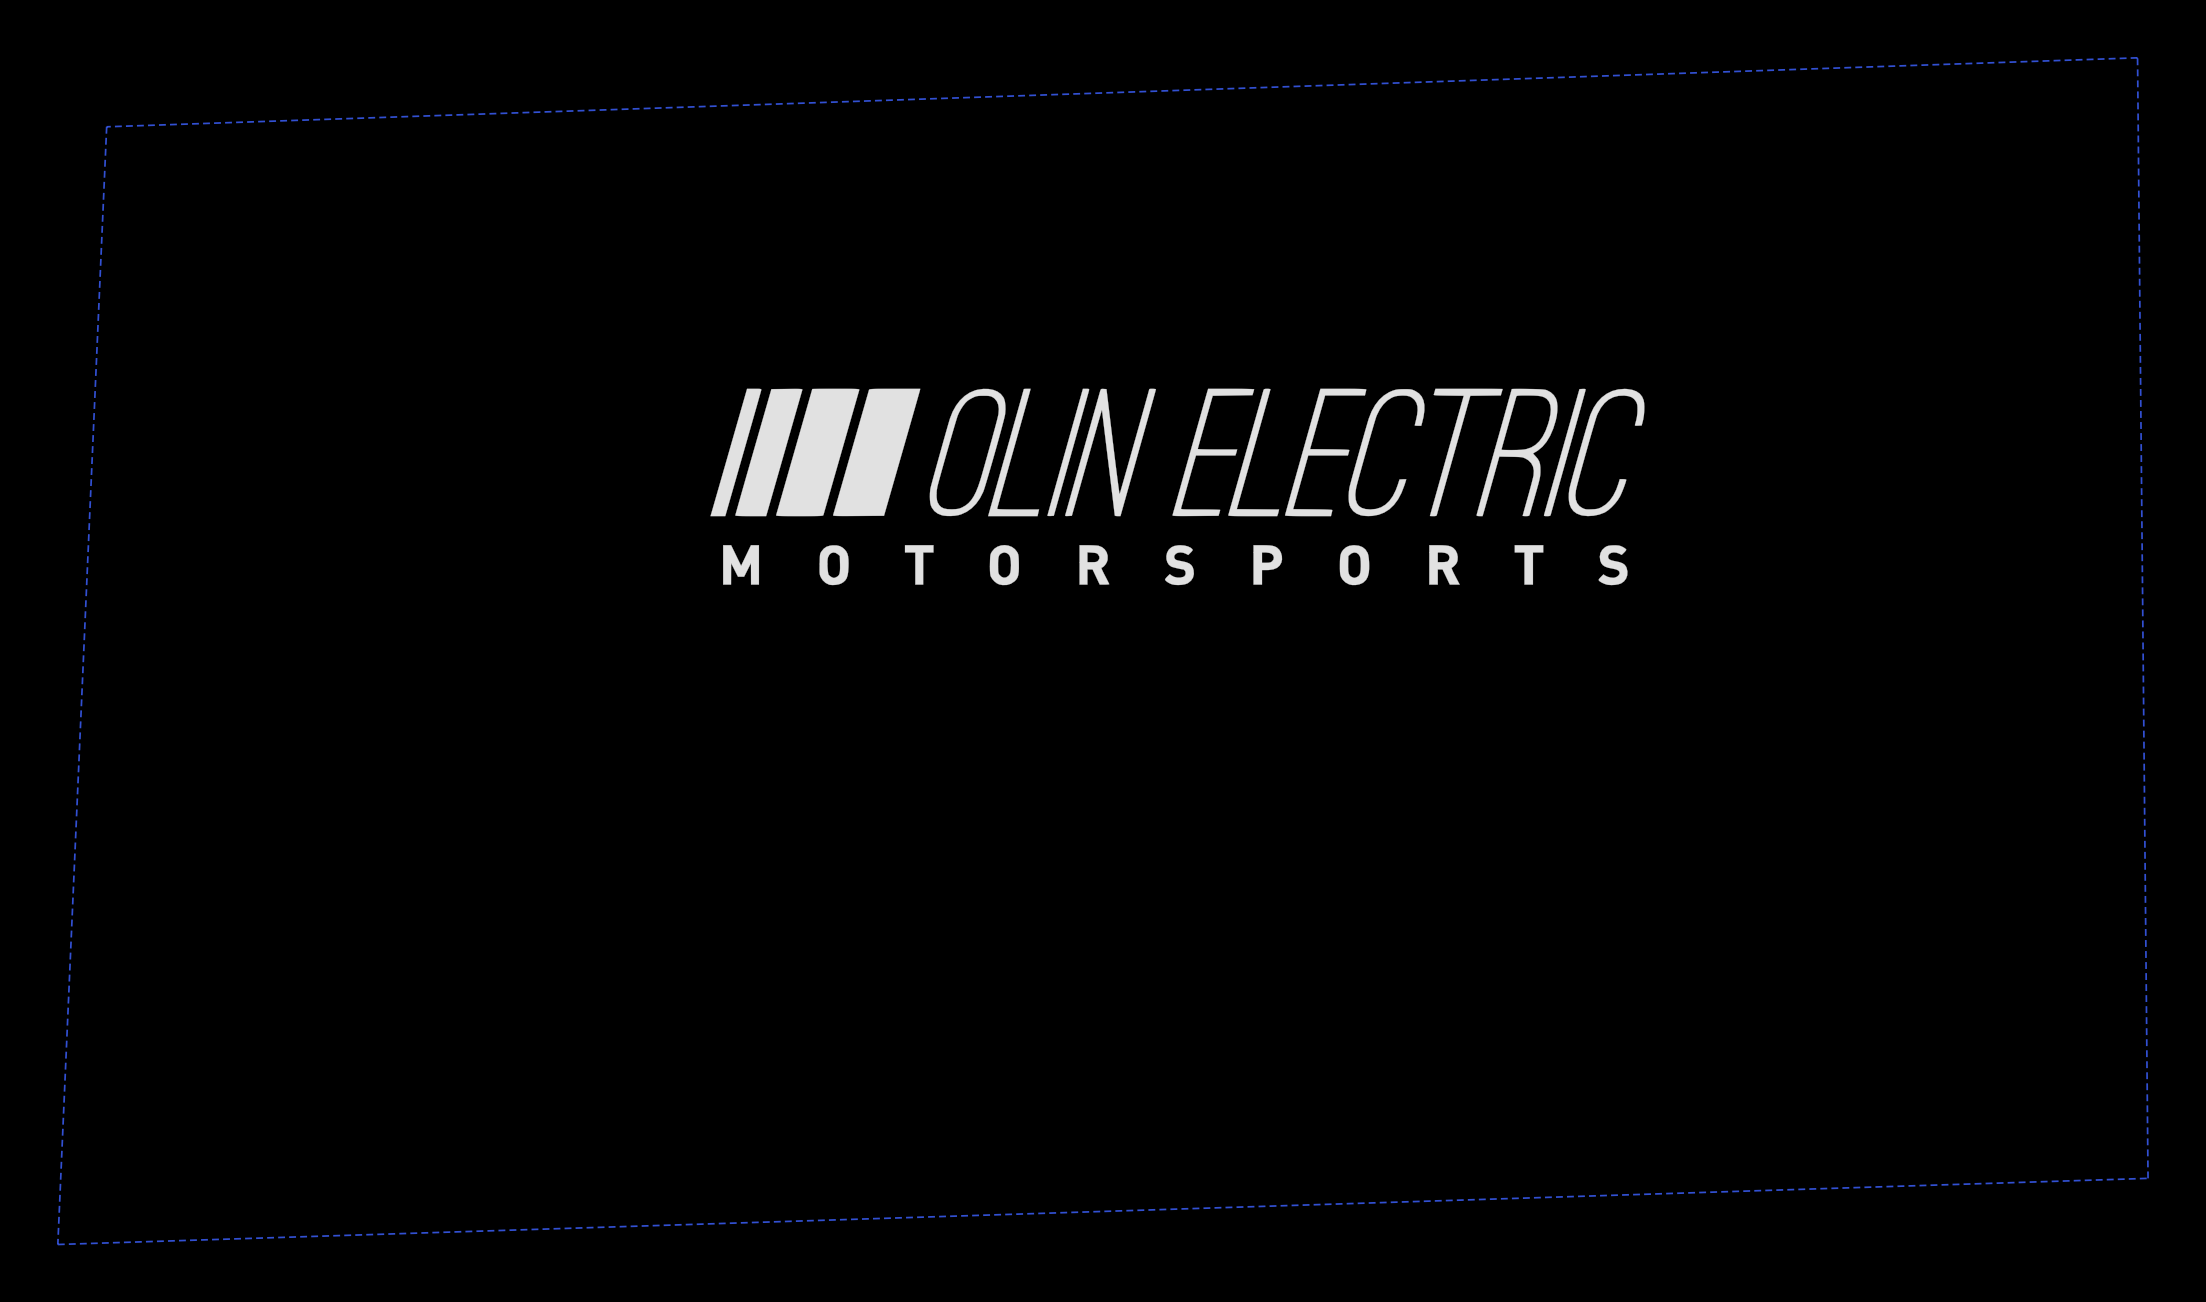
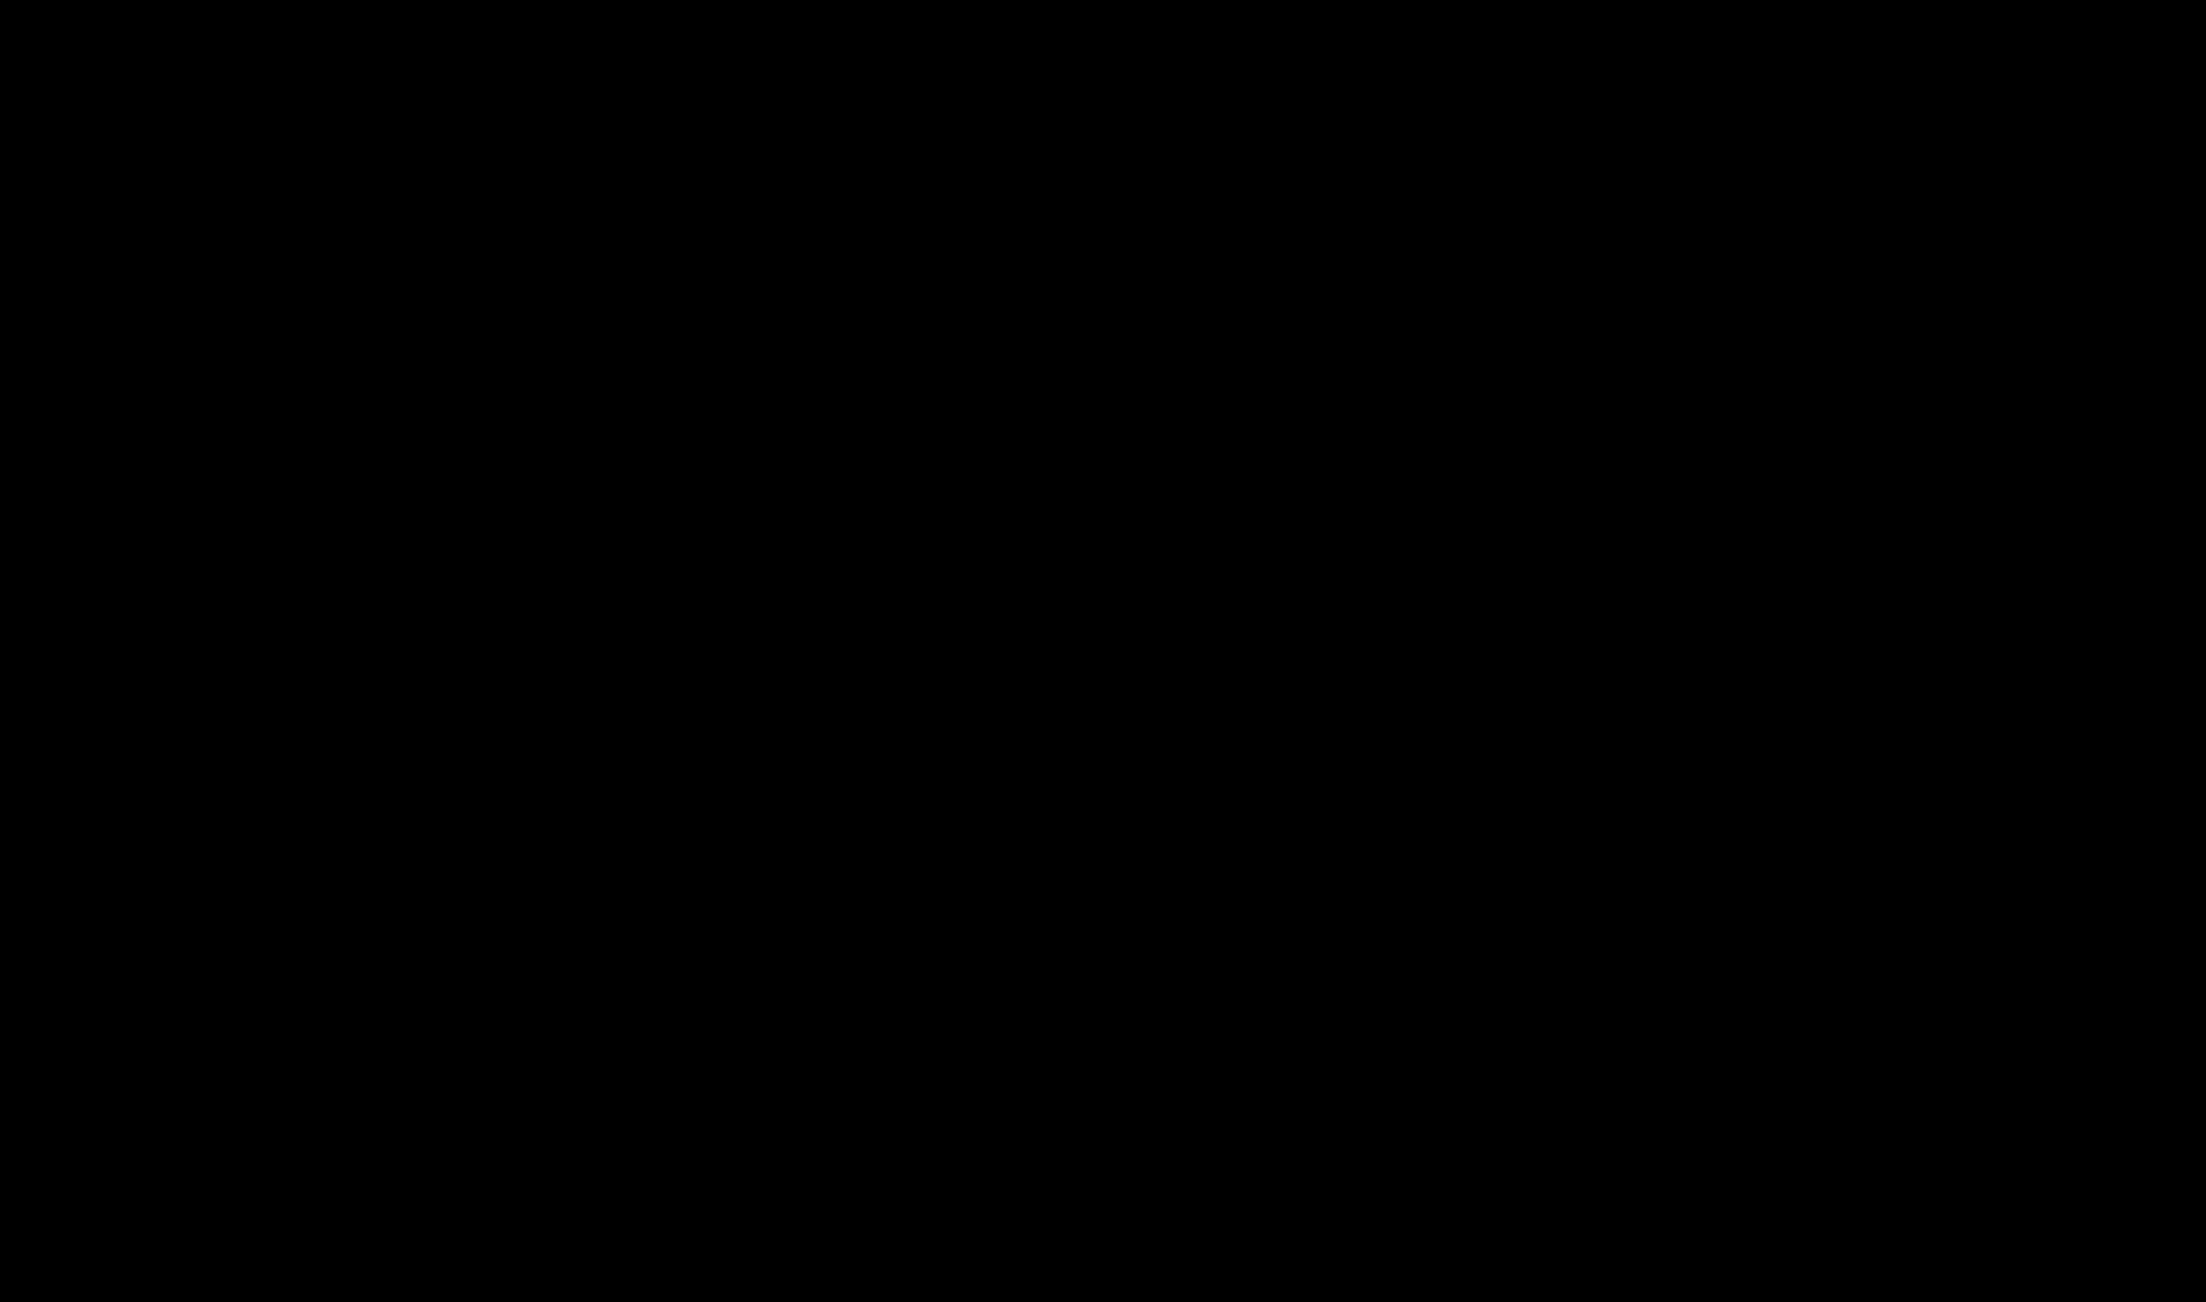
zone outline: (2137, 57) (106, 126) (57, 1244) (2148, 1178) (2137, 57) -> none
drawing: [710, 388, 1645, 586] -> none

